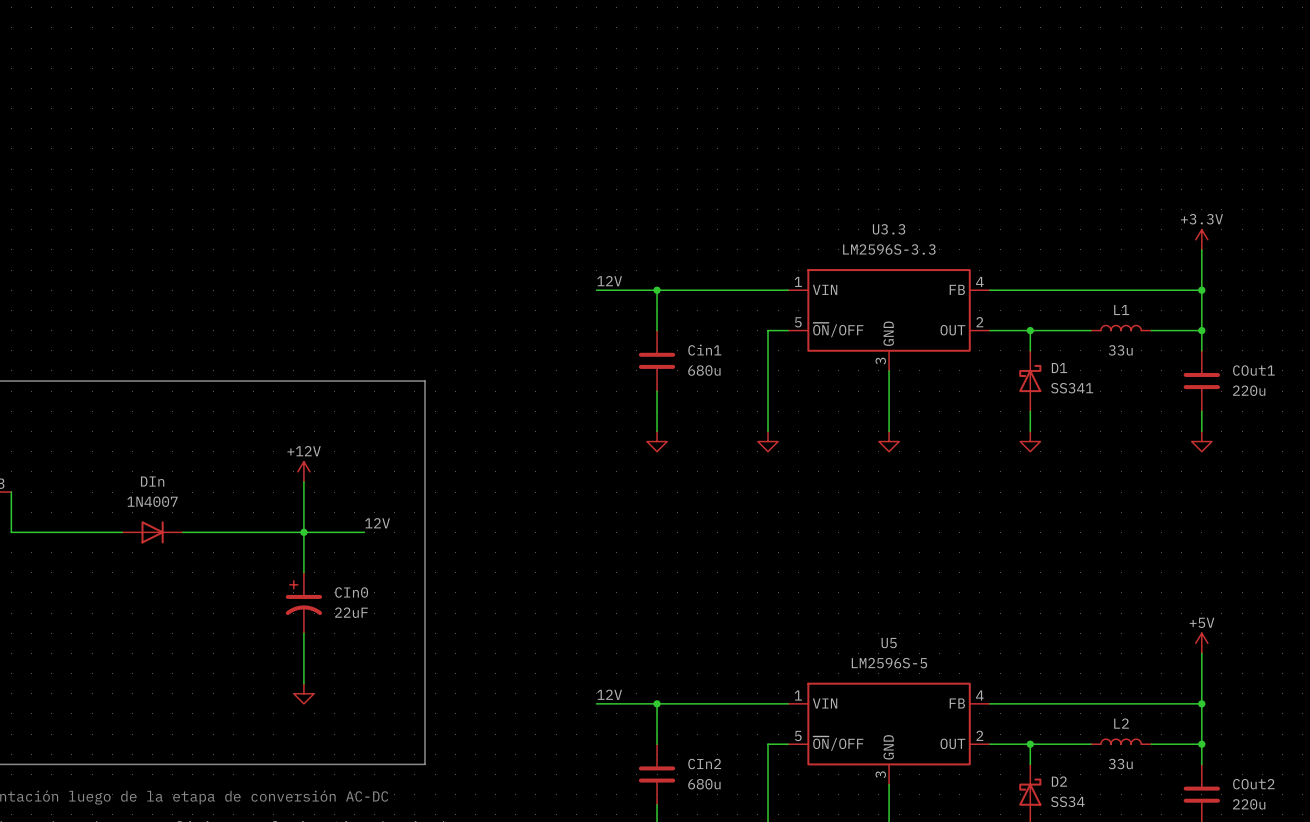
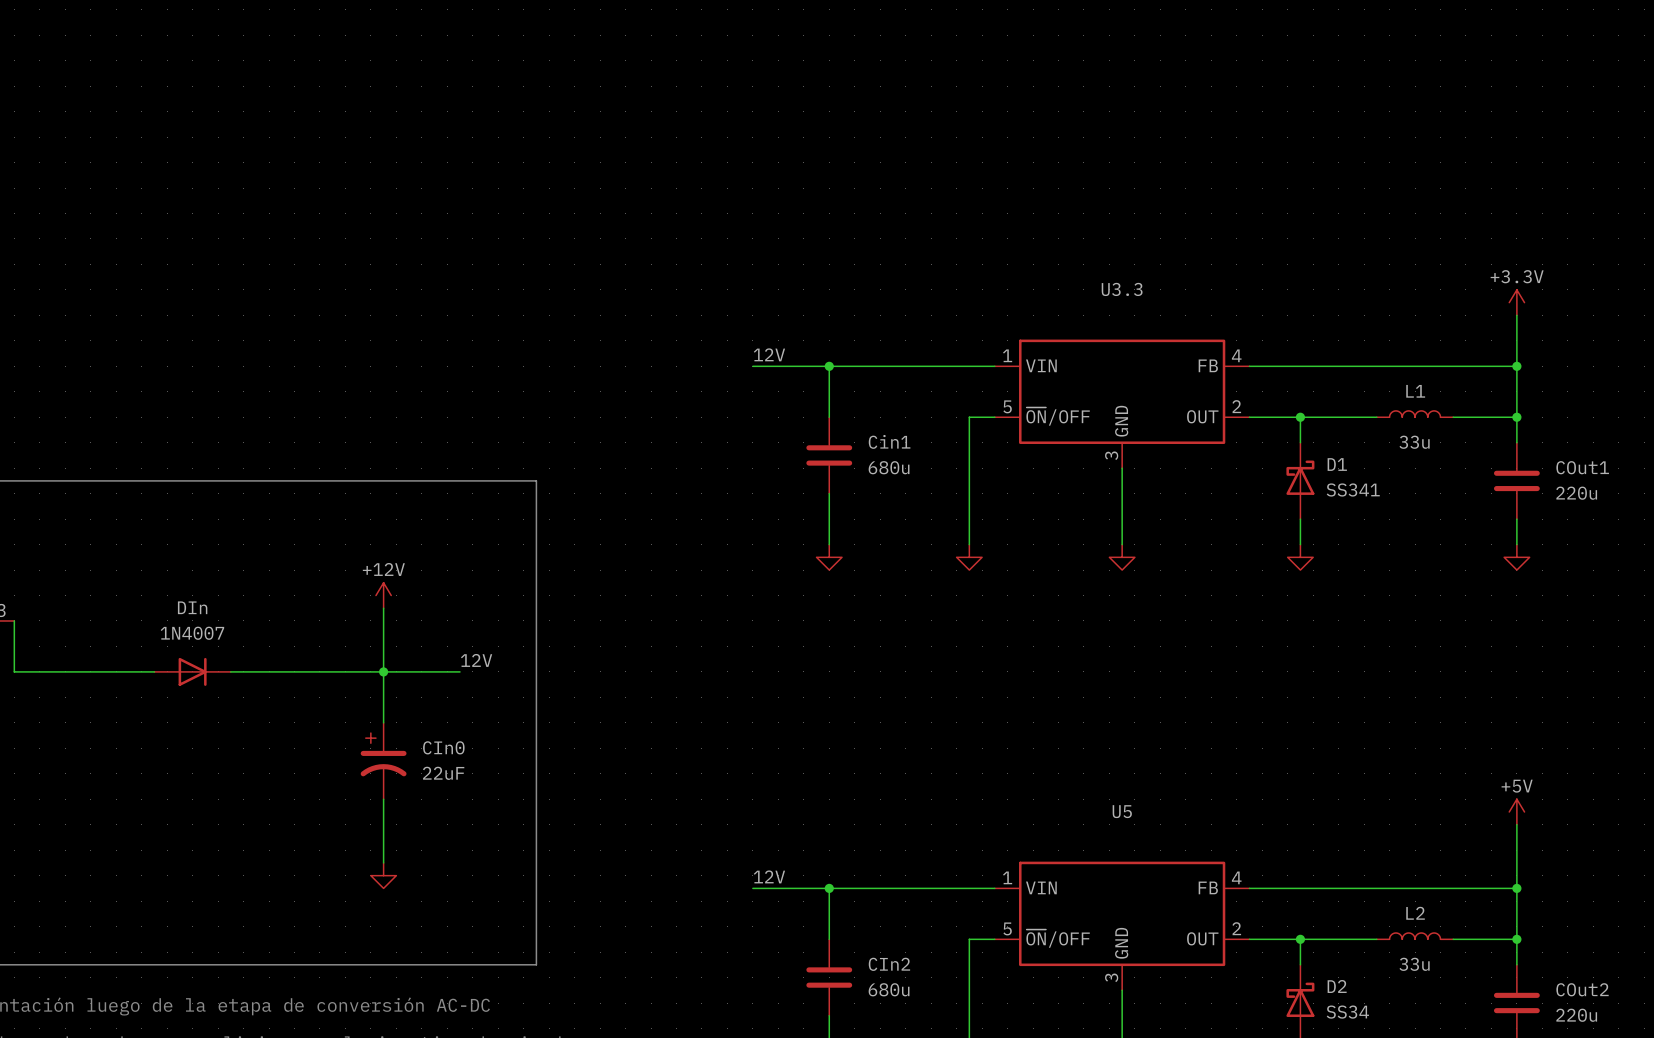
U3.3 value: LM2596S-3.3 (889, 249) -> none
U5 value: LM2596S-5 (889, 663) -> none

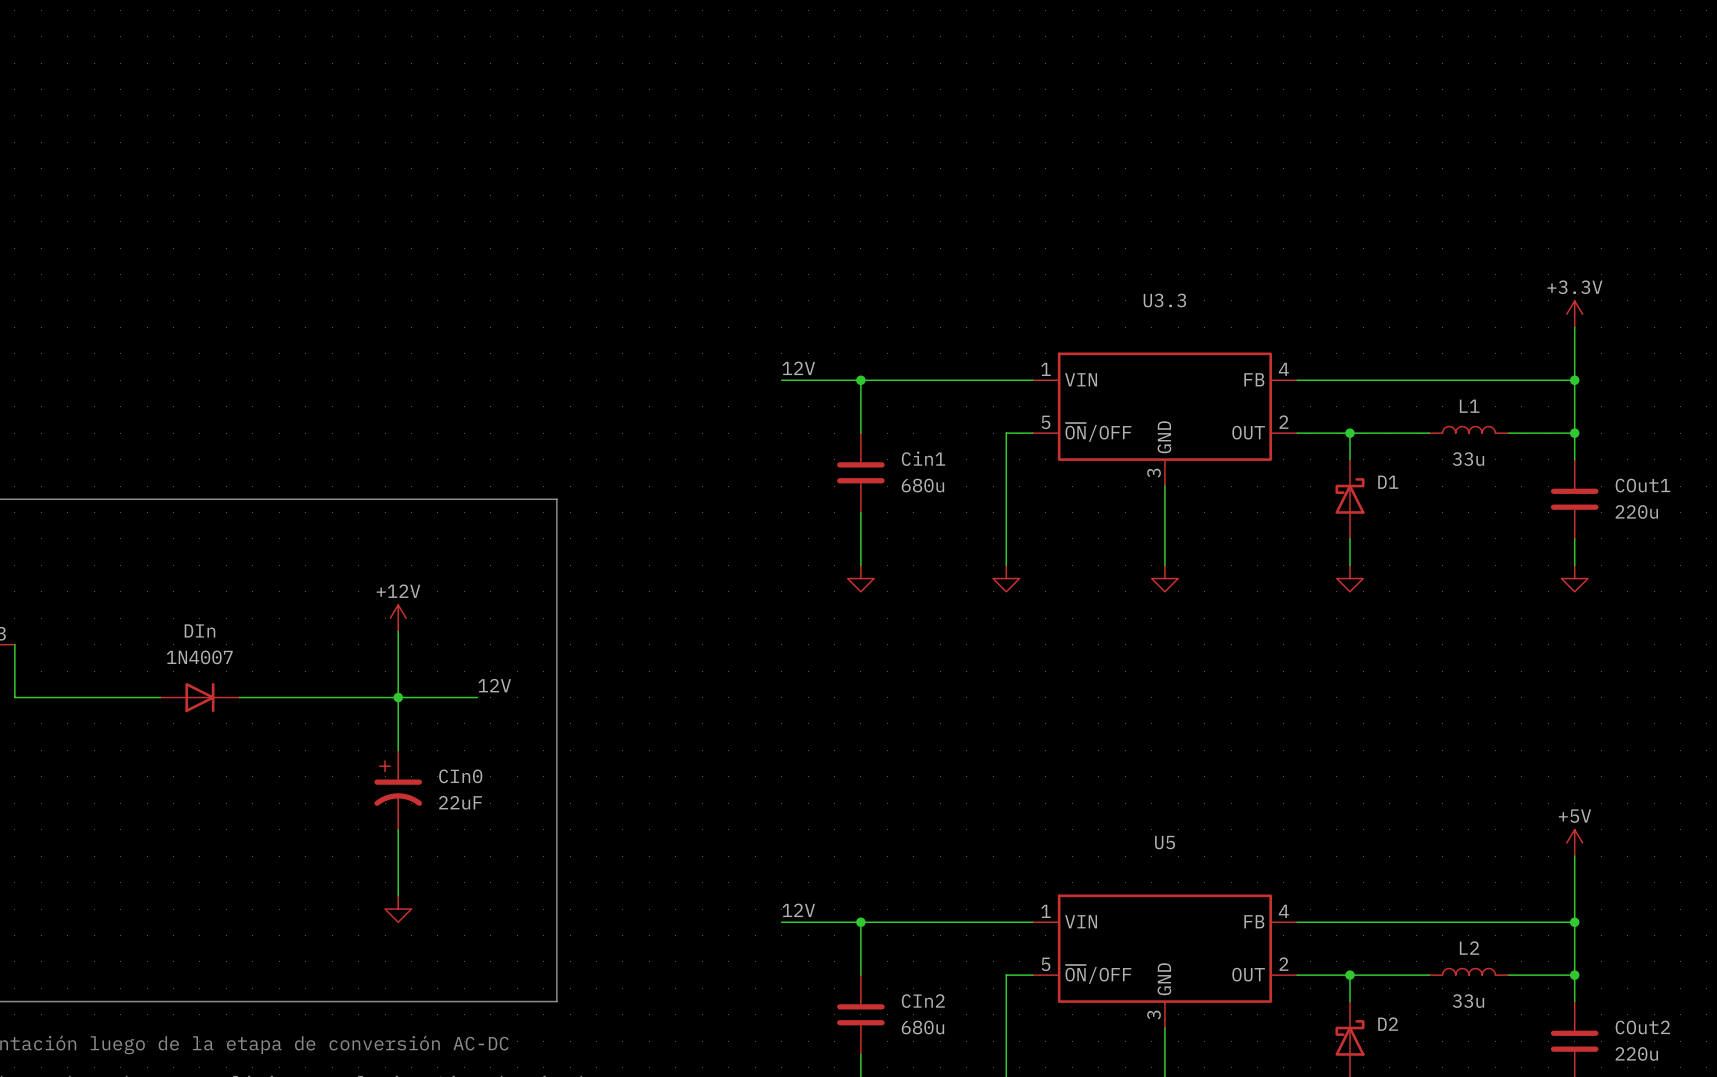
D1 value: SS341 (1353, 489) -> none
D2 value: SS34 (1347, 1012) -> none

